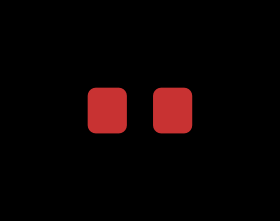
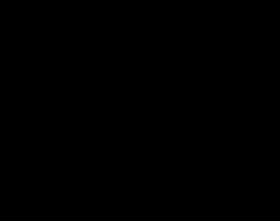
part: (139, 110) -> none

